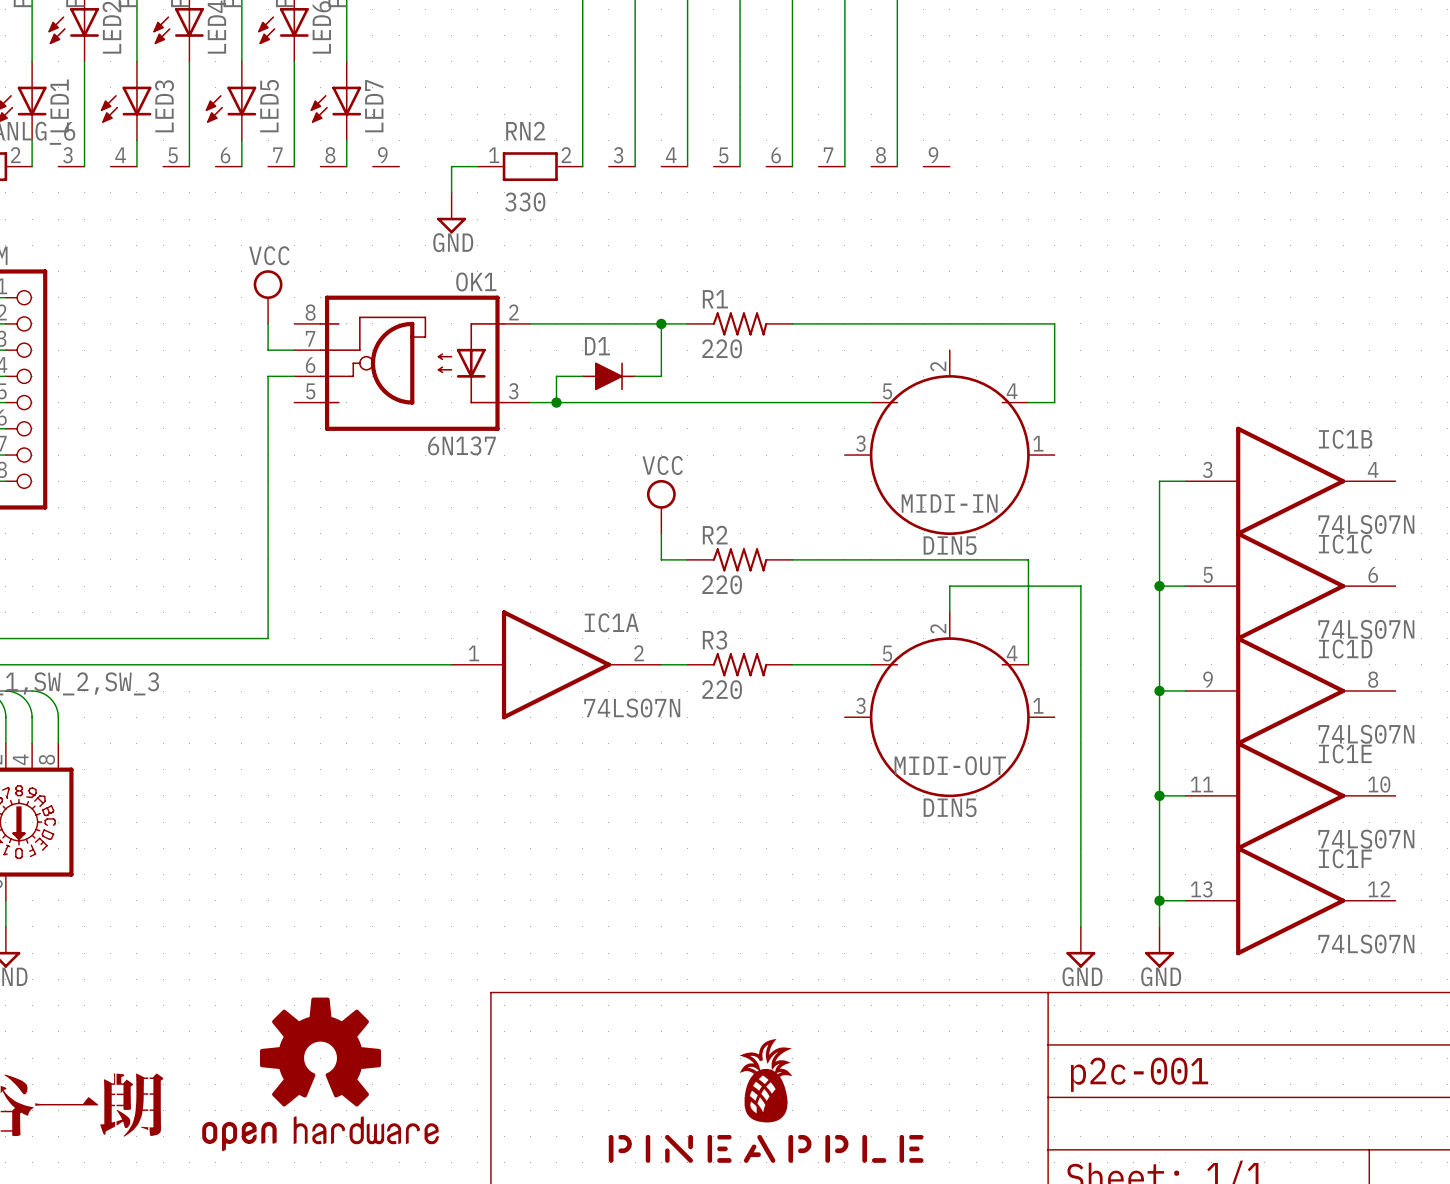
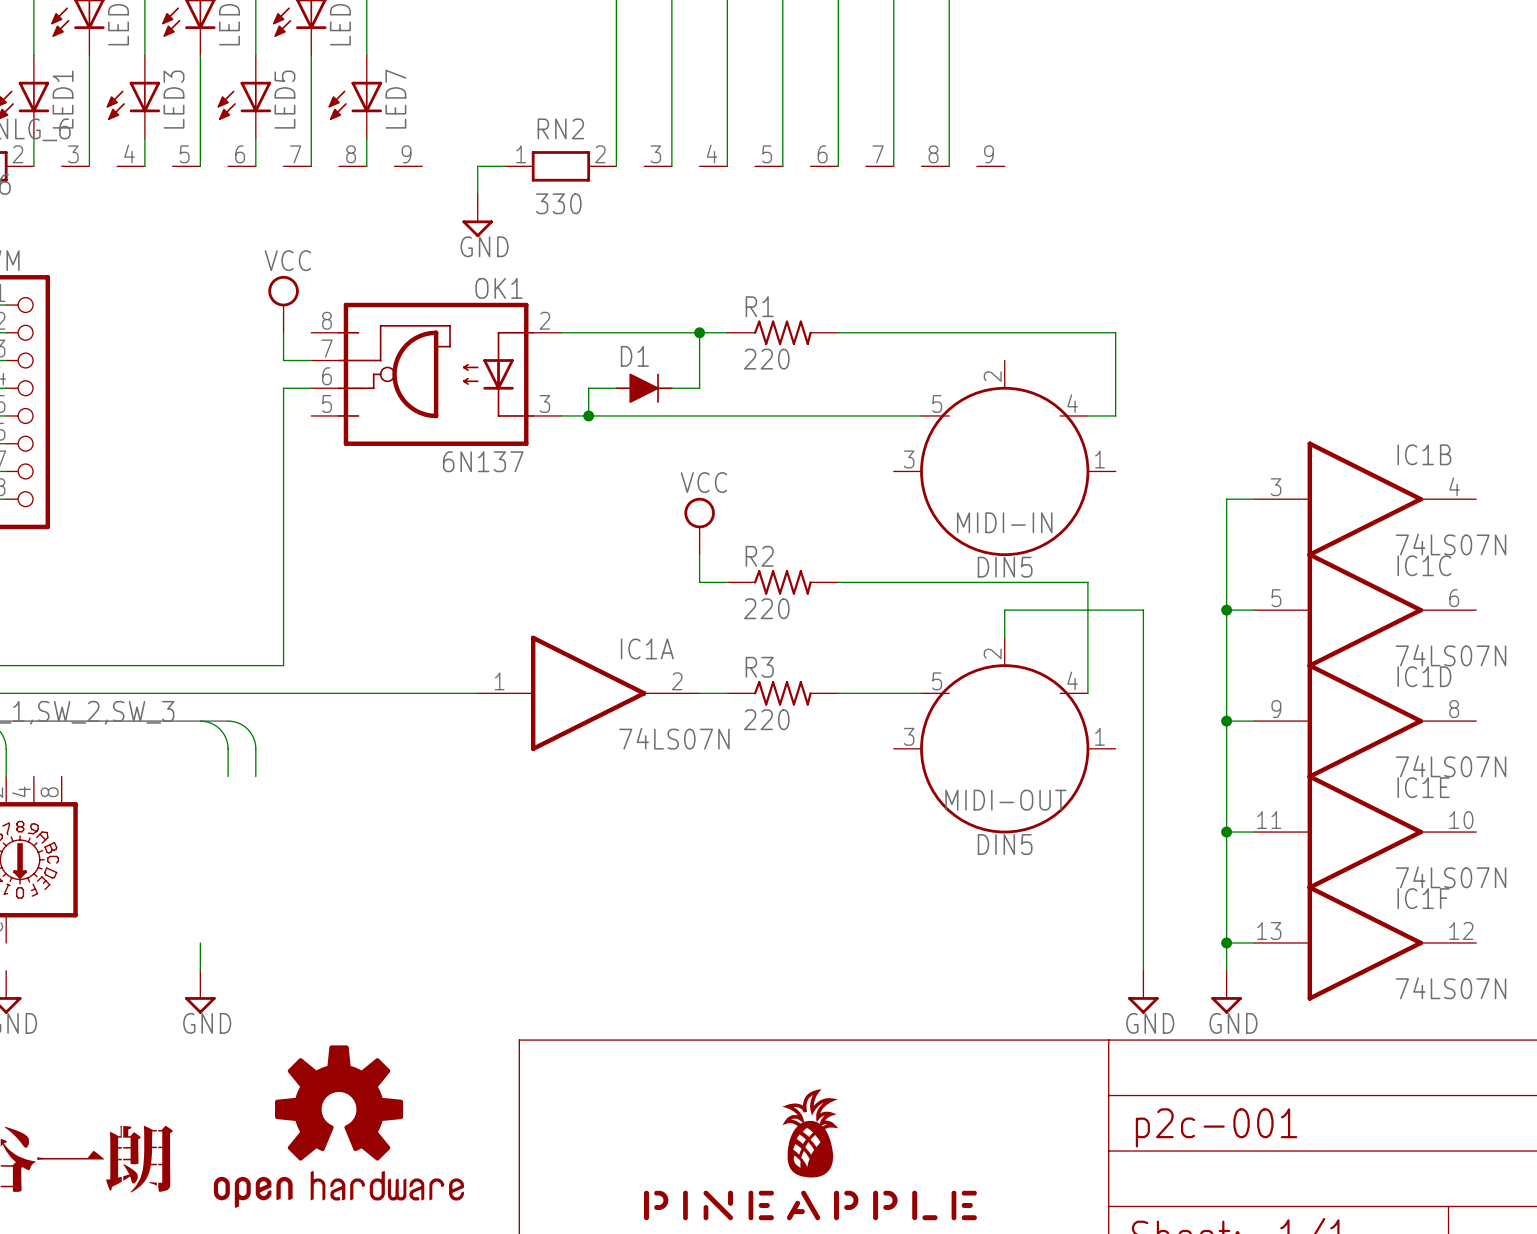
wire: (5, 691) (18, 694) (28, 704) (31, 713) (32, 743) -> (200, 721) (214, 724) (224, 734) (227, 745) (228, 776)
bus: none -> (33, 721) (228, 721)
wire: (32, 691) (45, 694) (54, 704) (58, 713) (58, 743) -> (228, 721) (241, 724) (252, 734) (255, 745) (255, 776)
wire: (5, 900) (5, 926) -> (200, 942) (200, 970)
power symbol: none -> GND (200, 992)

